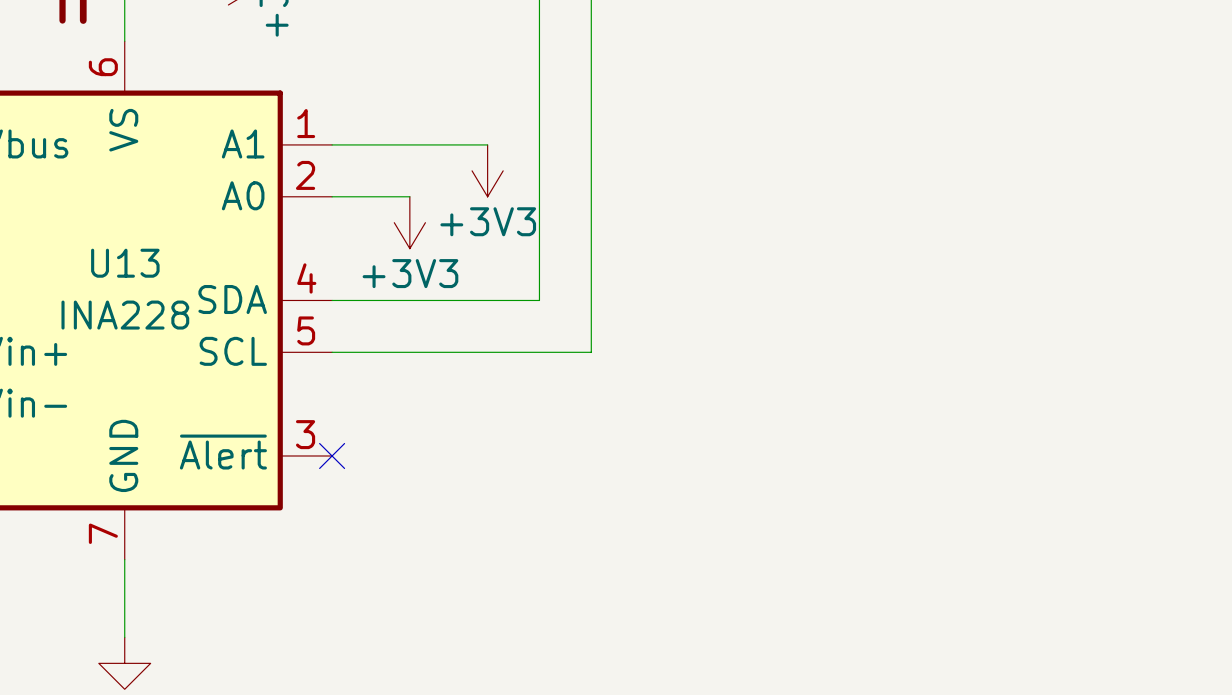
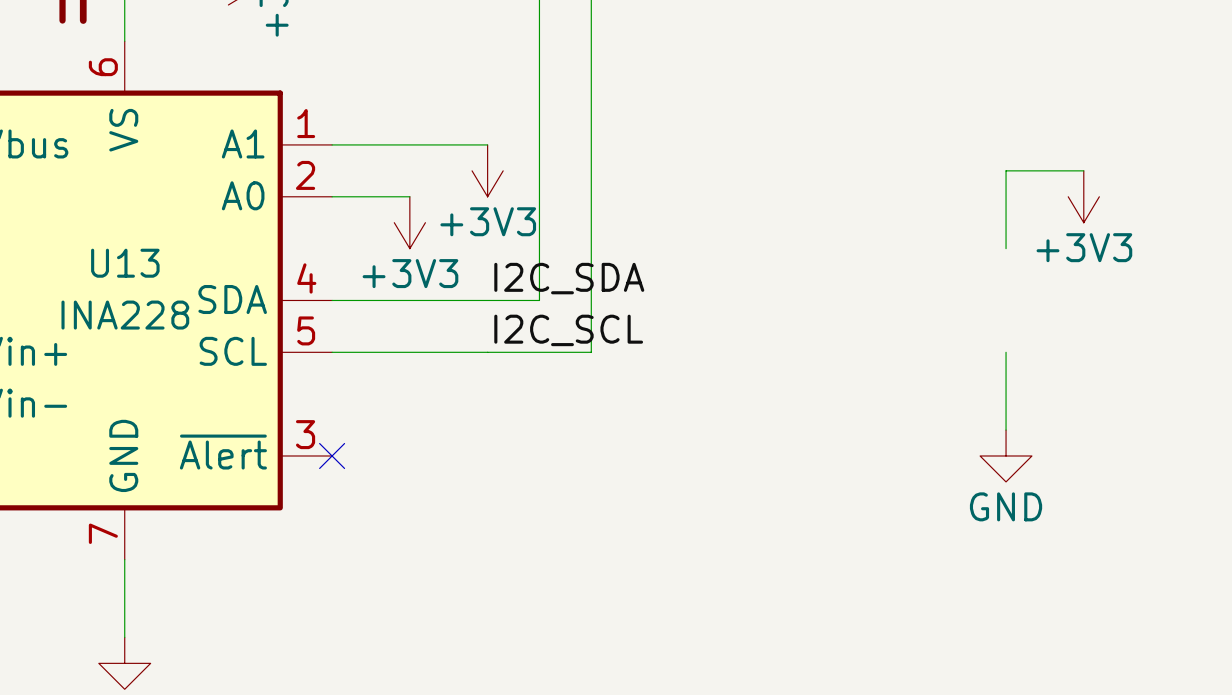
wire: none -> (1083, 170) (1006, 170) (1006, 248)
power symbol: none -> +3V3 (1083, 196)
label: none -> I2C_SDA (569, 278)
label: none -> I2C_SCL (568, 330)
wire: none -> (1006, 352) (1006, 430)
power symbol: none -> GND (1006, 455)

